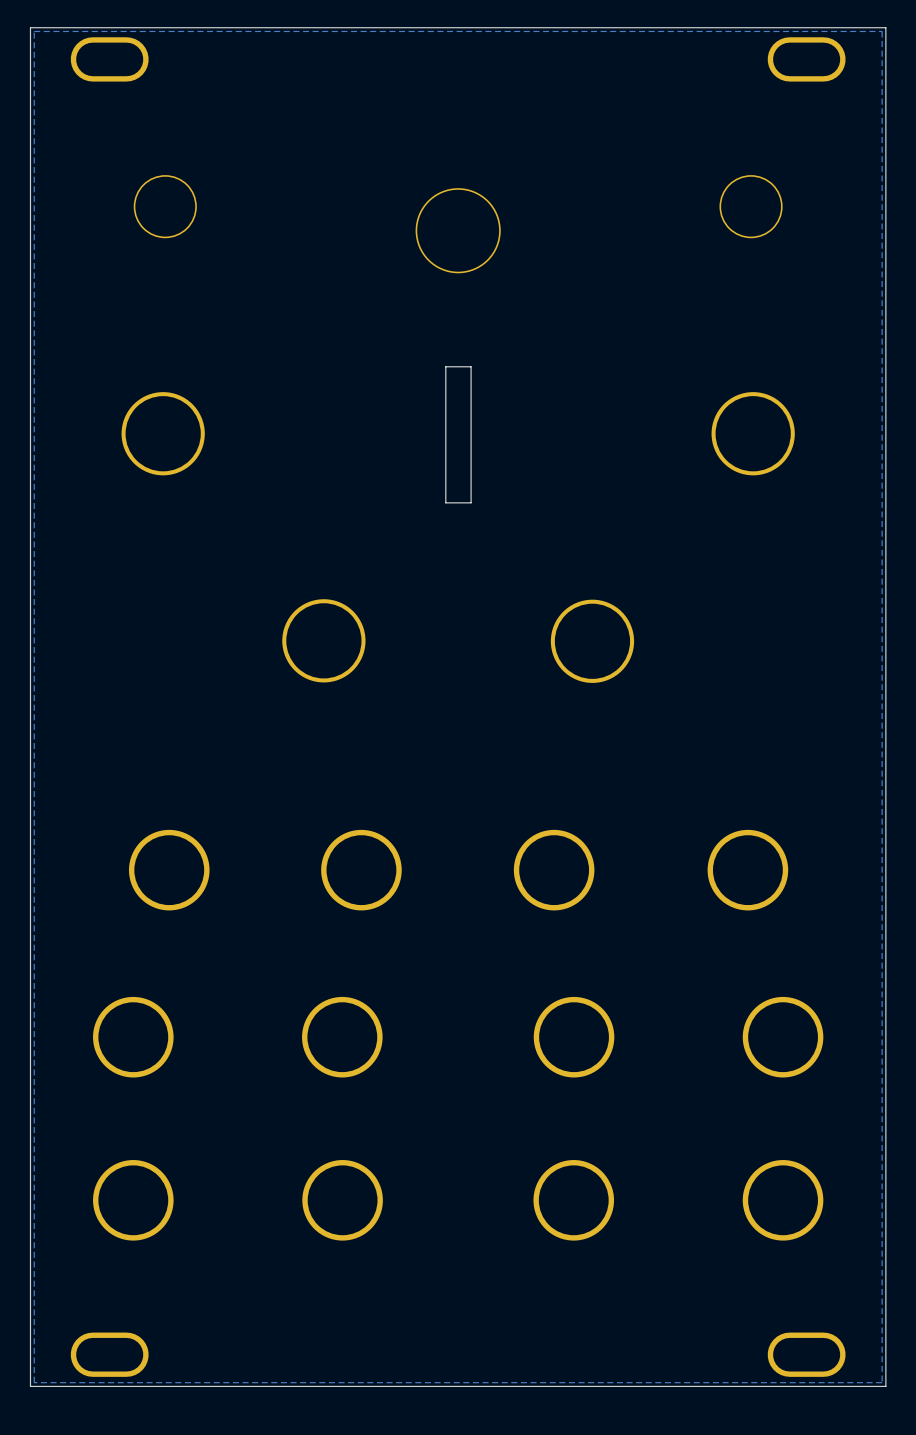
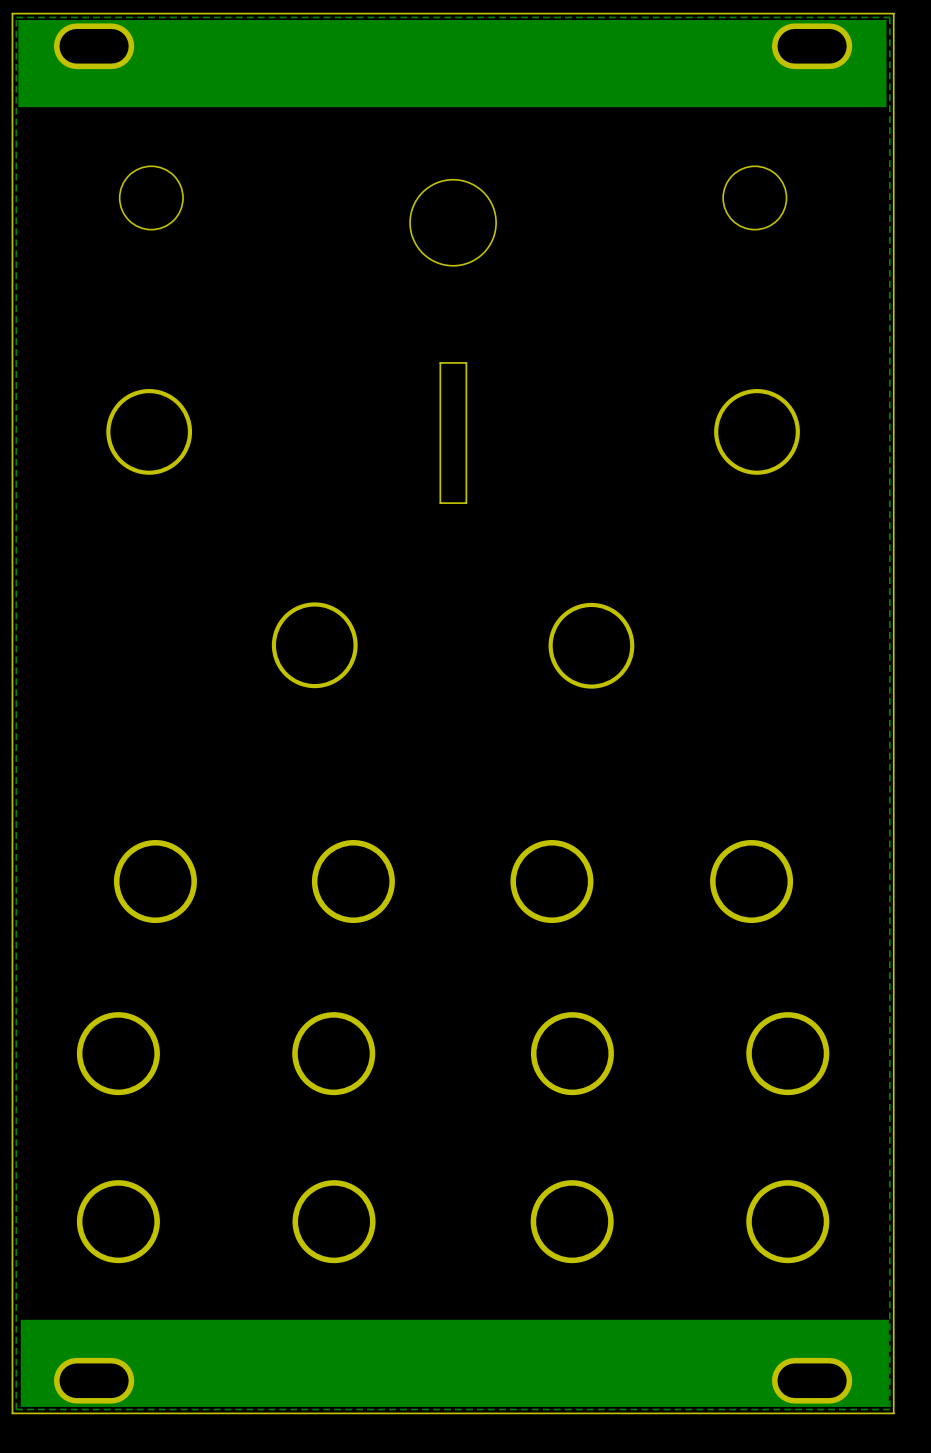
part: none -> (452, 63)
part: none -> (454, 1363)

